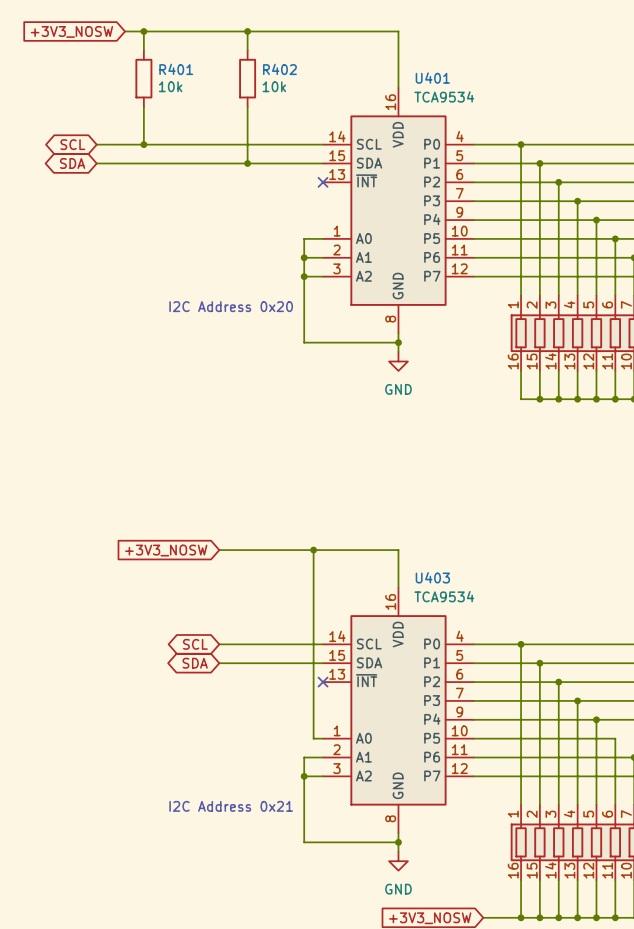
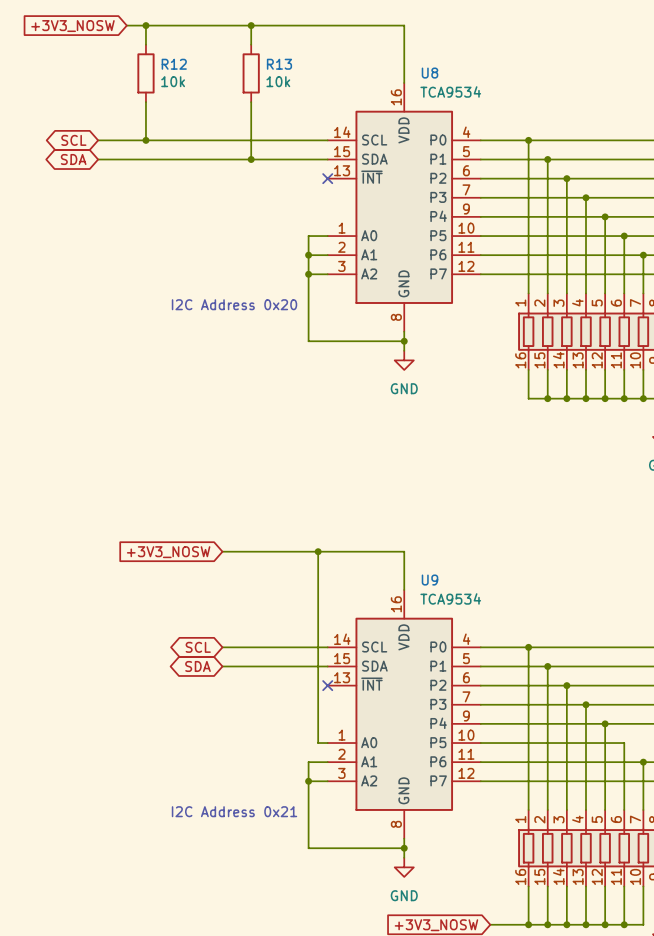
R401 name: R401 (176, 69) -> R12 (174, 64)
R402 name: R402 (279, 69) -> R13 (279, 64)
U401 name: U401 (432, 78) -> U8 (430, 73)
U403 name: U403 (432, 577) -> U9 (430, 580)

